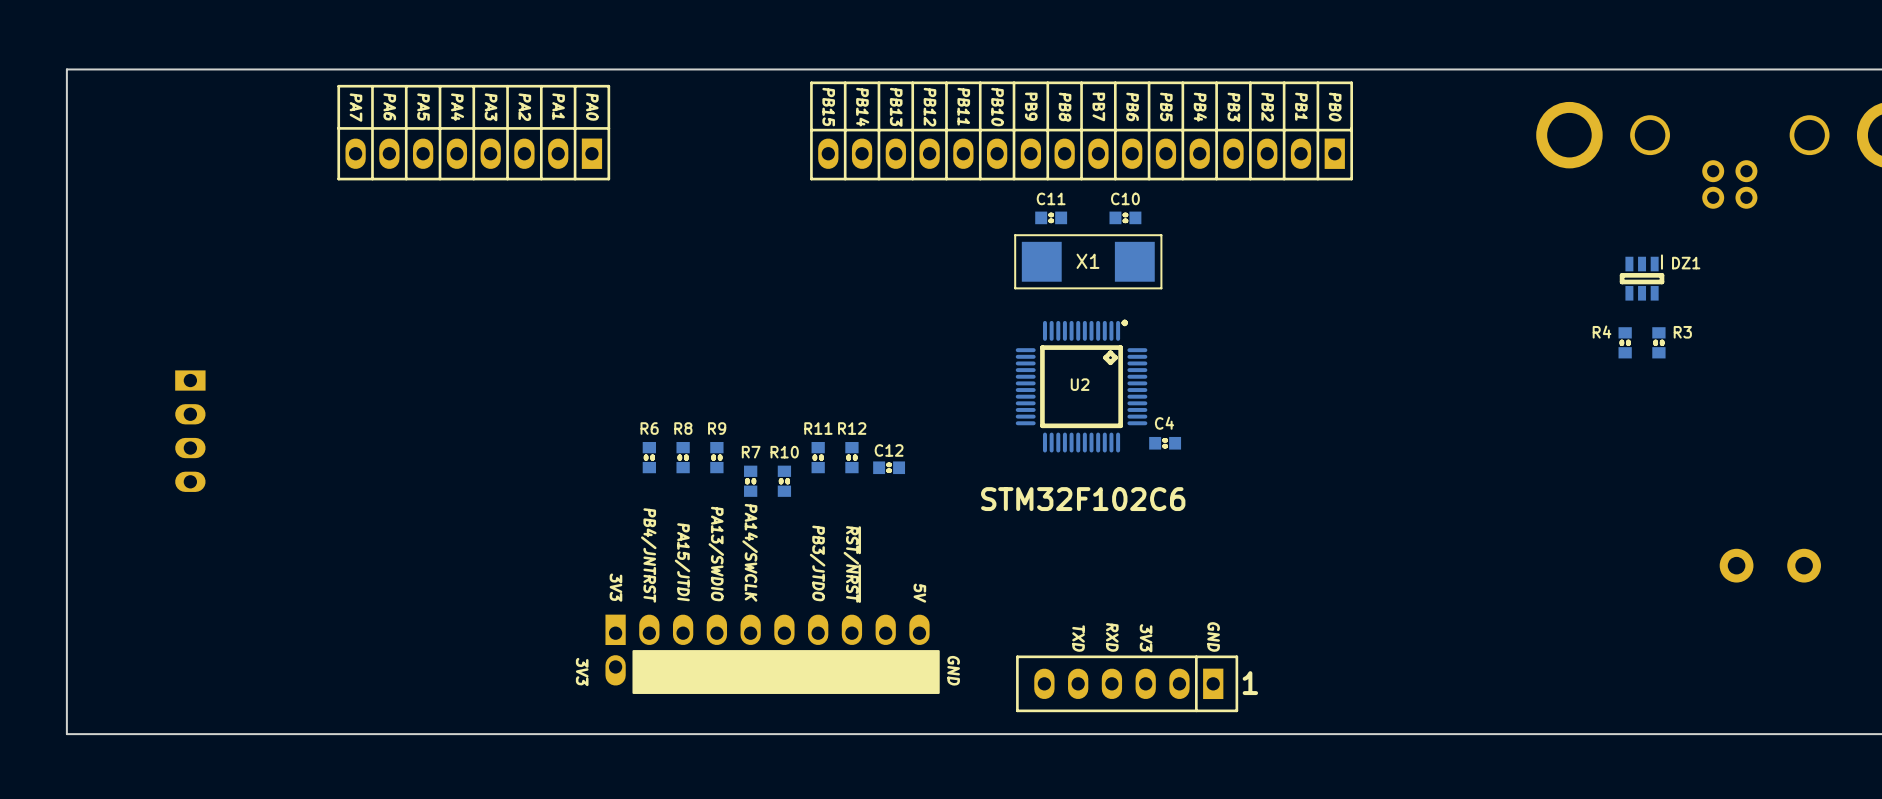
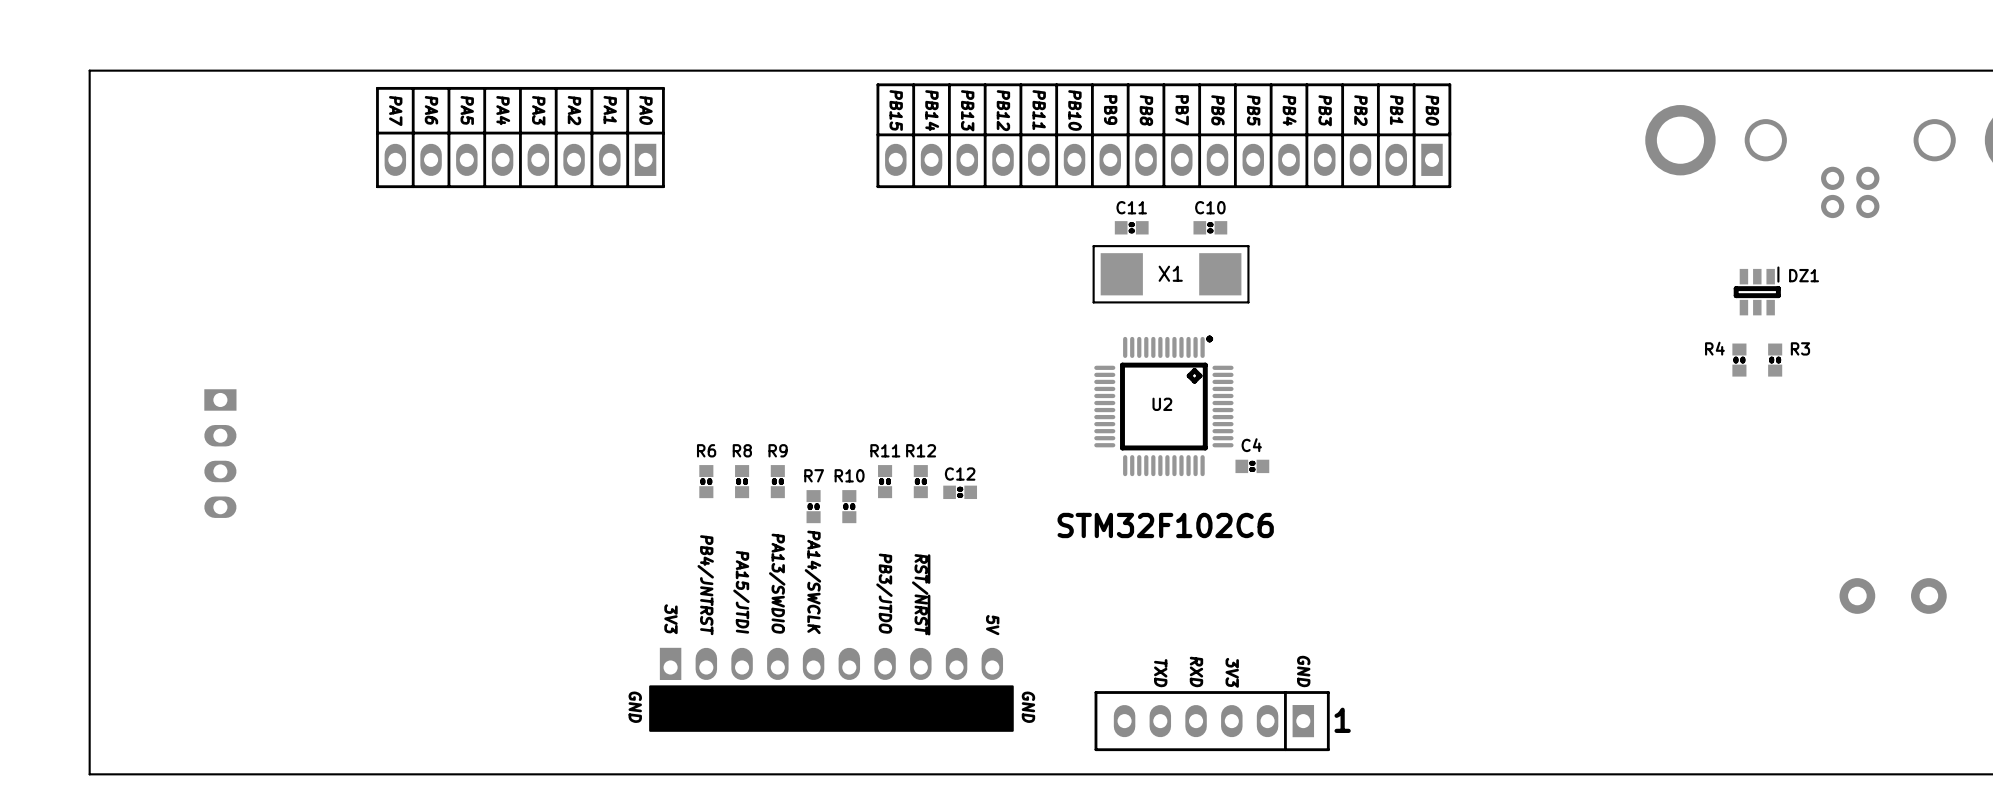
drawing: none -> [649, 685, 1014, 732]
drawing: [632, 650, 940, 694] -> none
text: 3V3 (582, 672) -> GND (635, 707)

